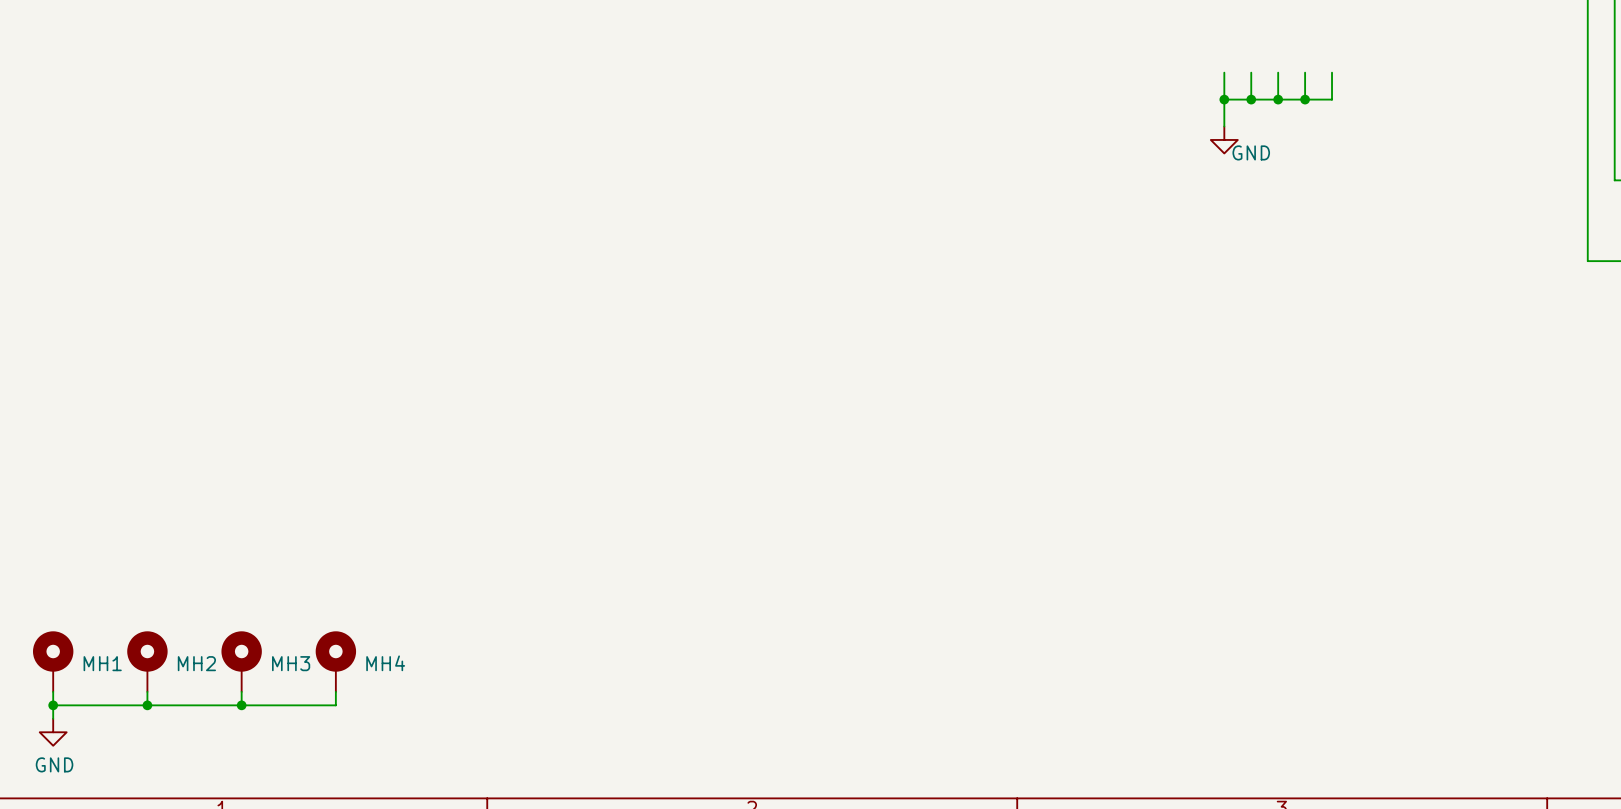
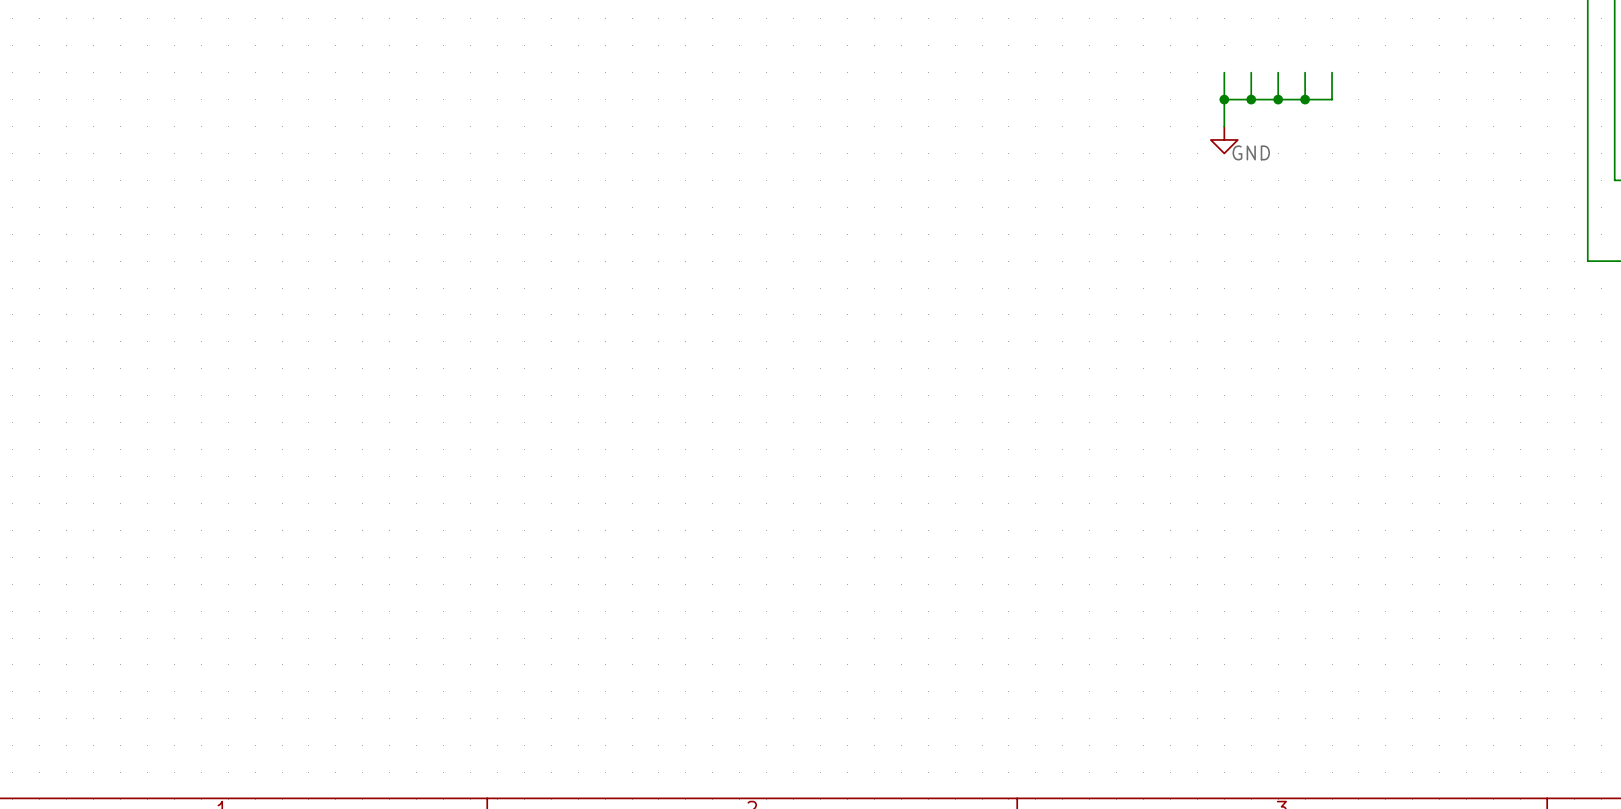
MH1: (53, 661) -> none
MH2: (147, 661) -> none
MH3: (241, 661) -> none
MH4: (335, 661) -> none
wire: (53, 691) (53, 718) -> none
wire: (147, 691) (147, 705) -> none
wire: (241, 691) (241, 705) -> none
wire: (335, 691) (335, 705) (53, 705) -> none
junction: (53, 705) -> none
junction: (147, 705) -> none
junction: (241, 705) -> none
power symbol: GND (53, 732) -> none

